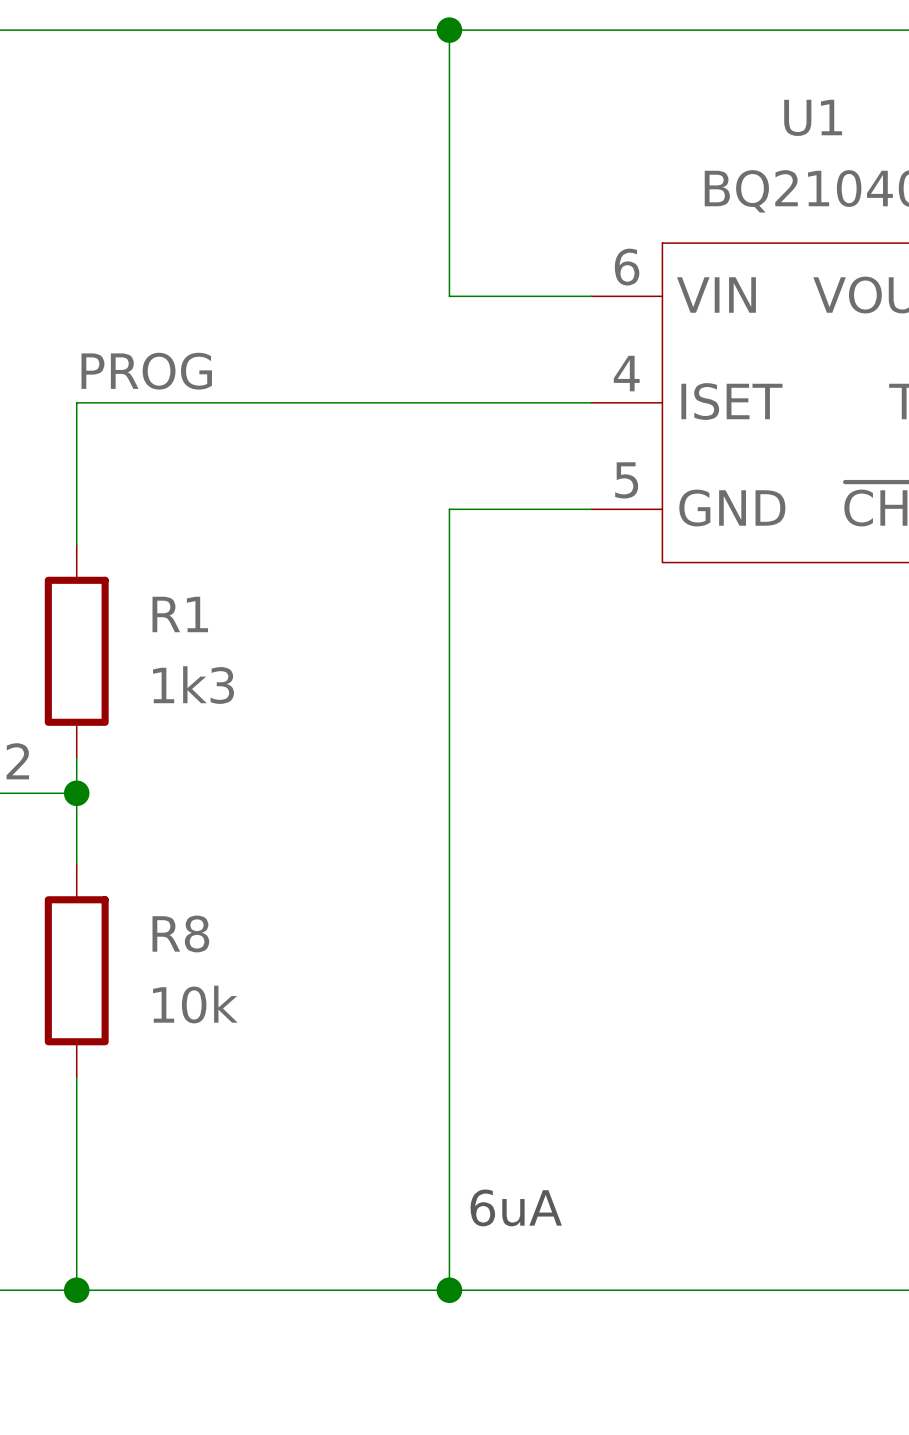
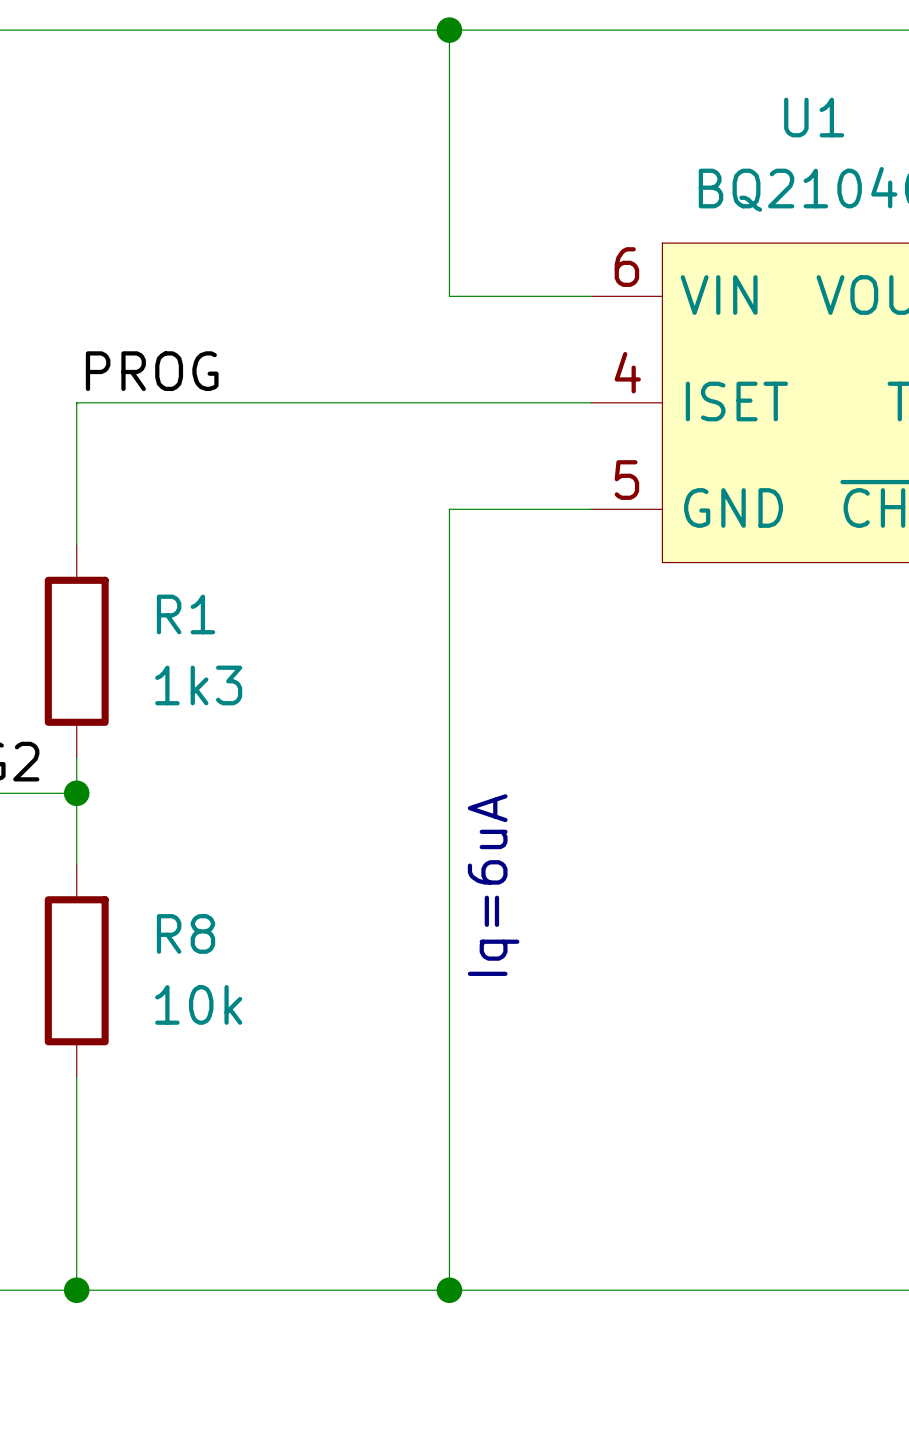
text: none -> Iq=6uA (493, 885)
text: 6uA (516, 1207) -> none

